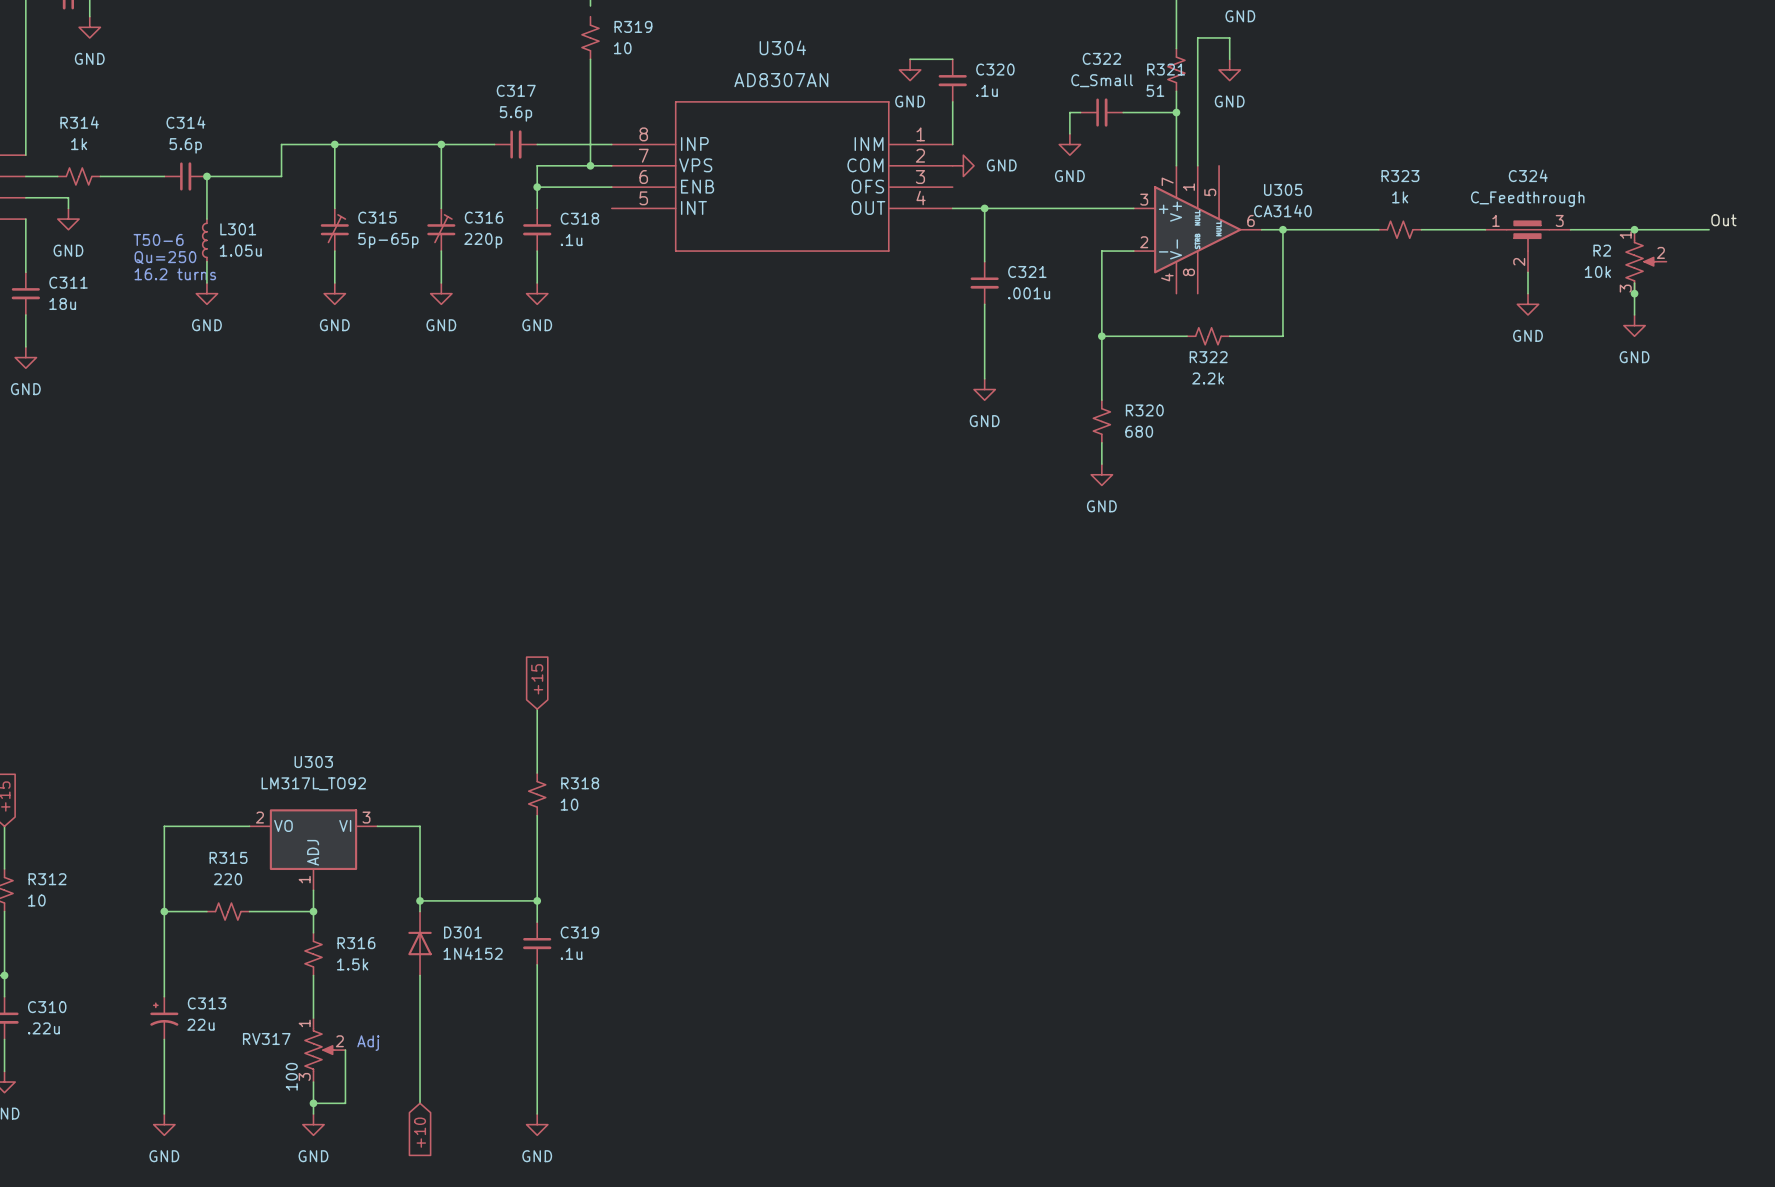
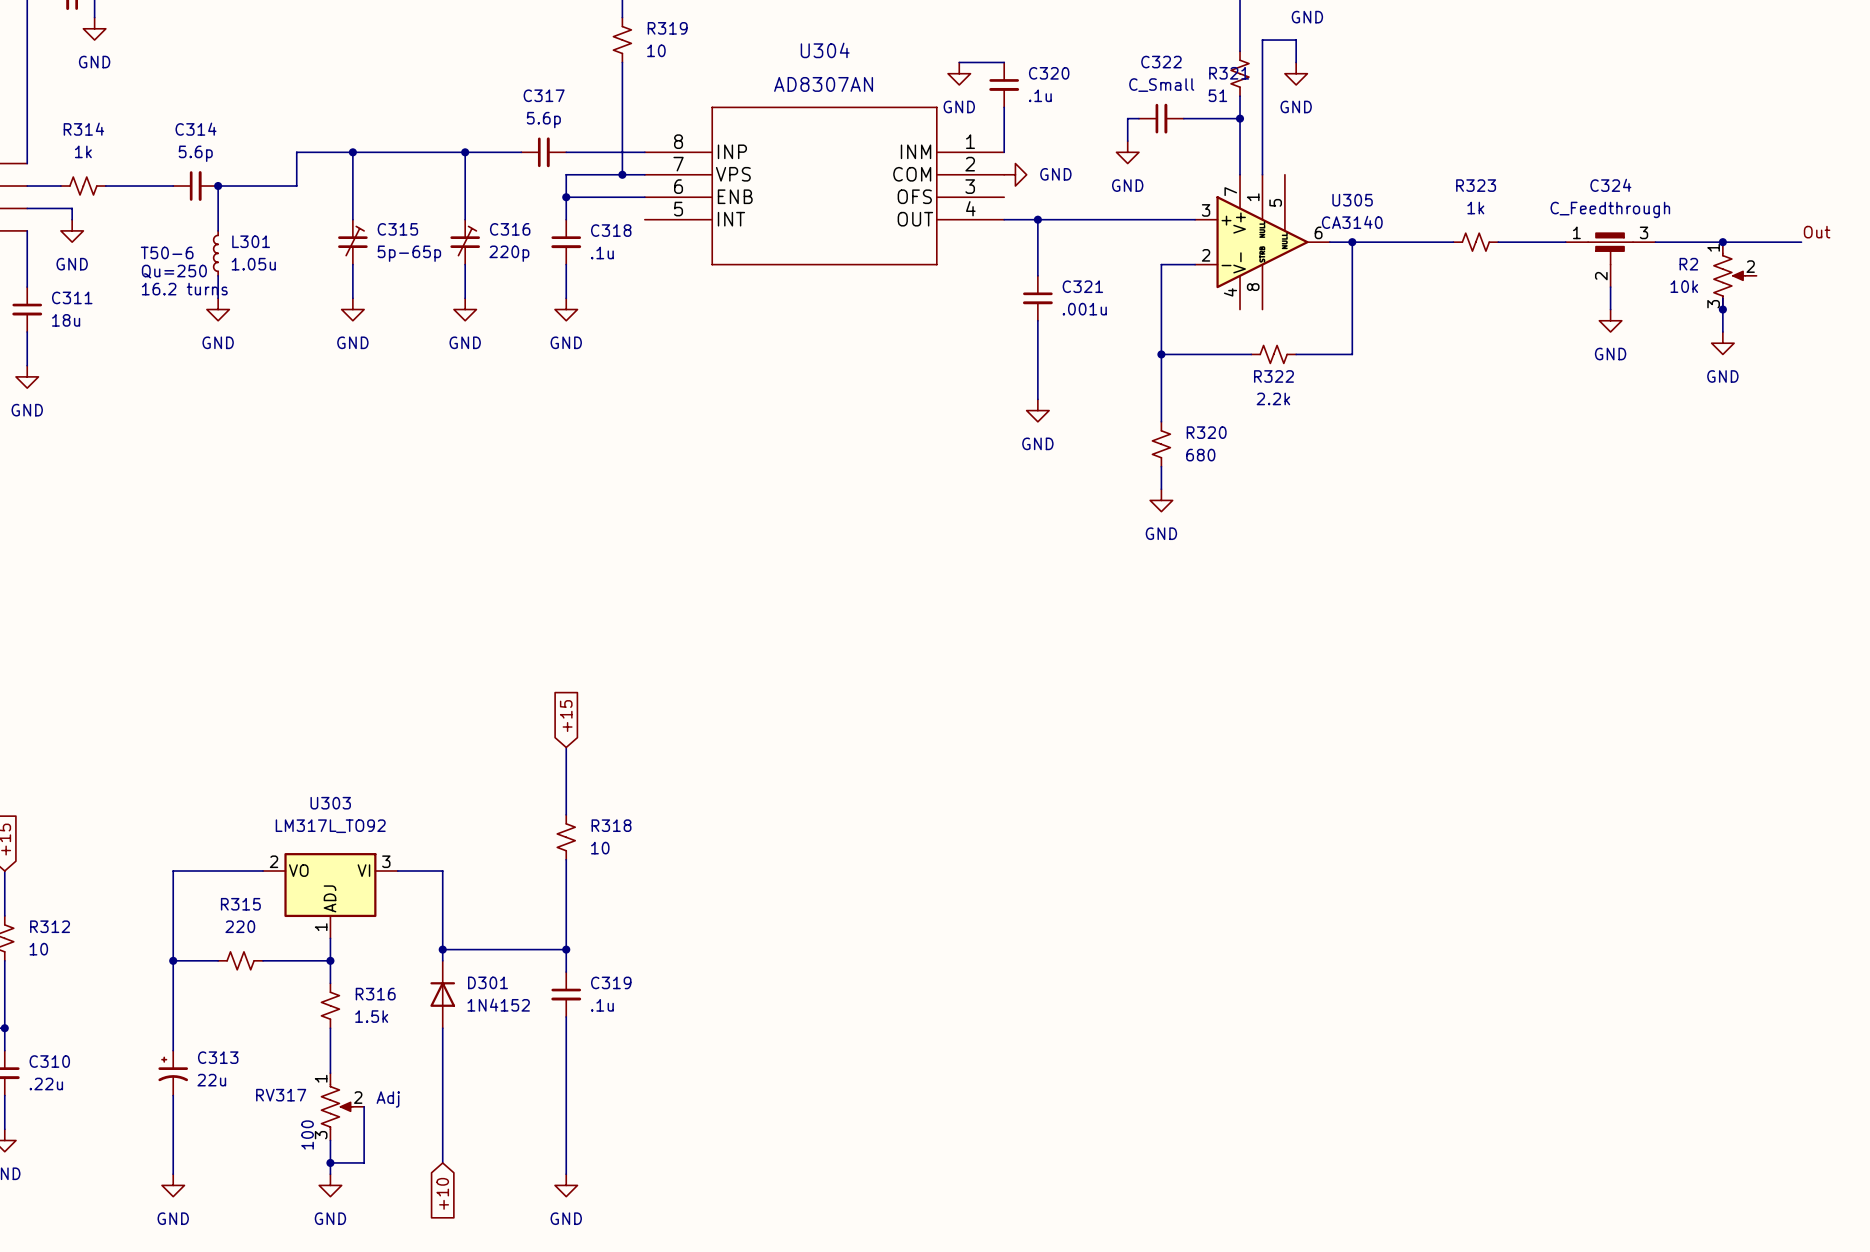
wire: none -> (622, 6) (622, 17)

